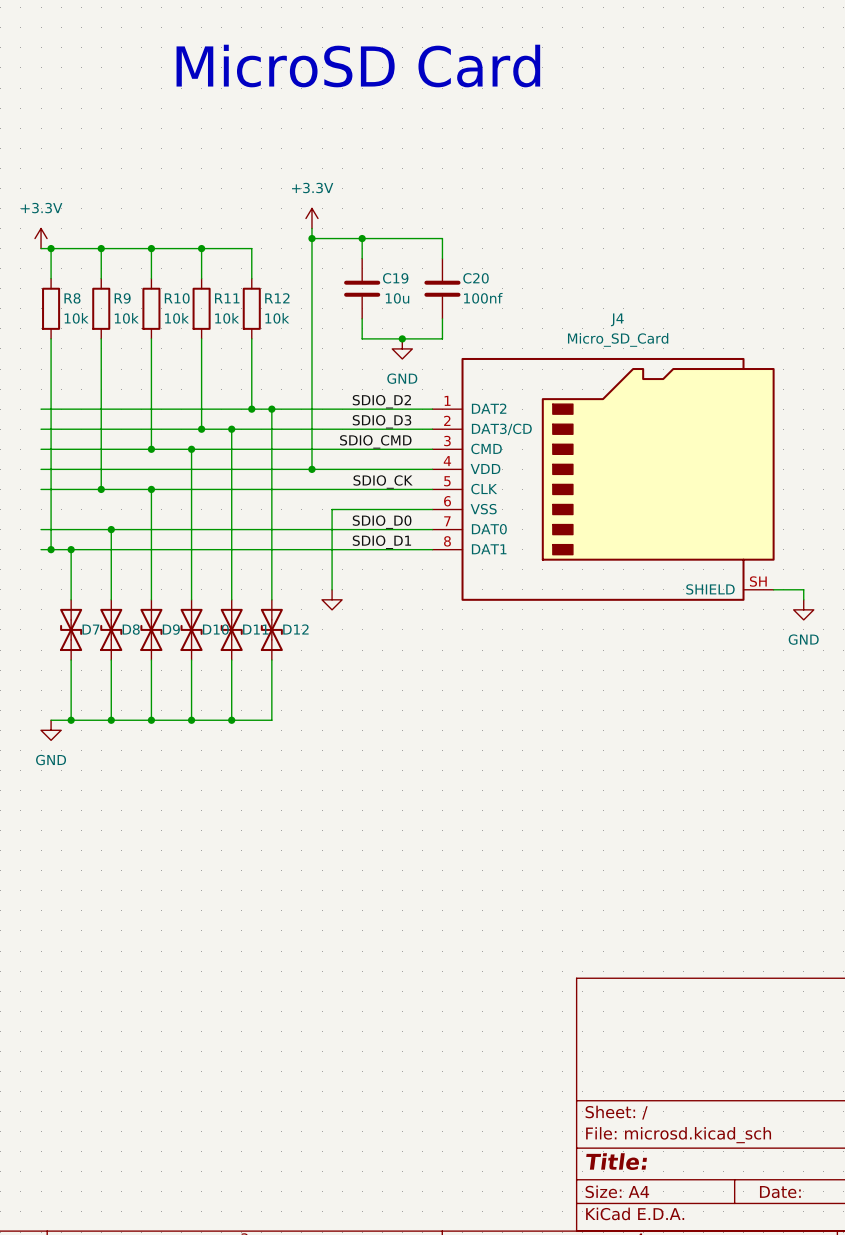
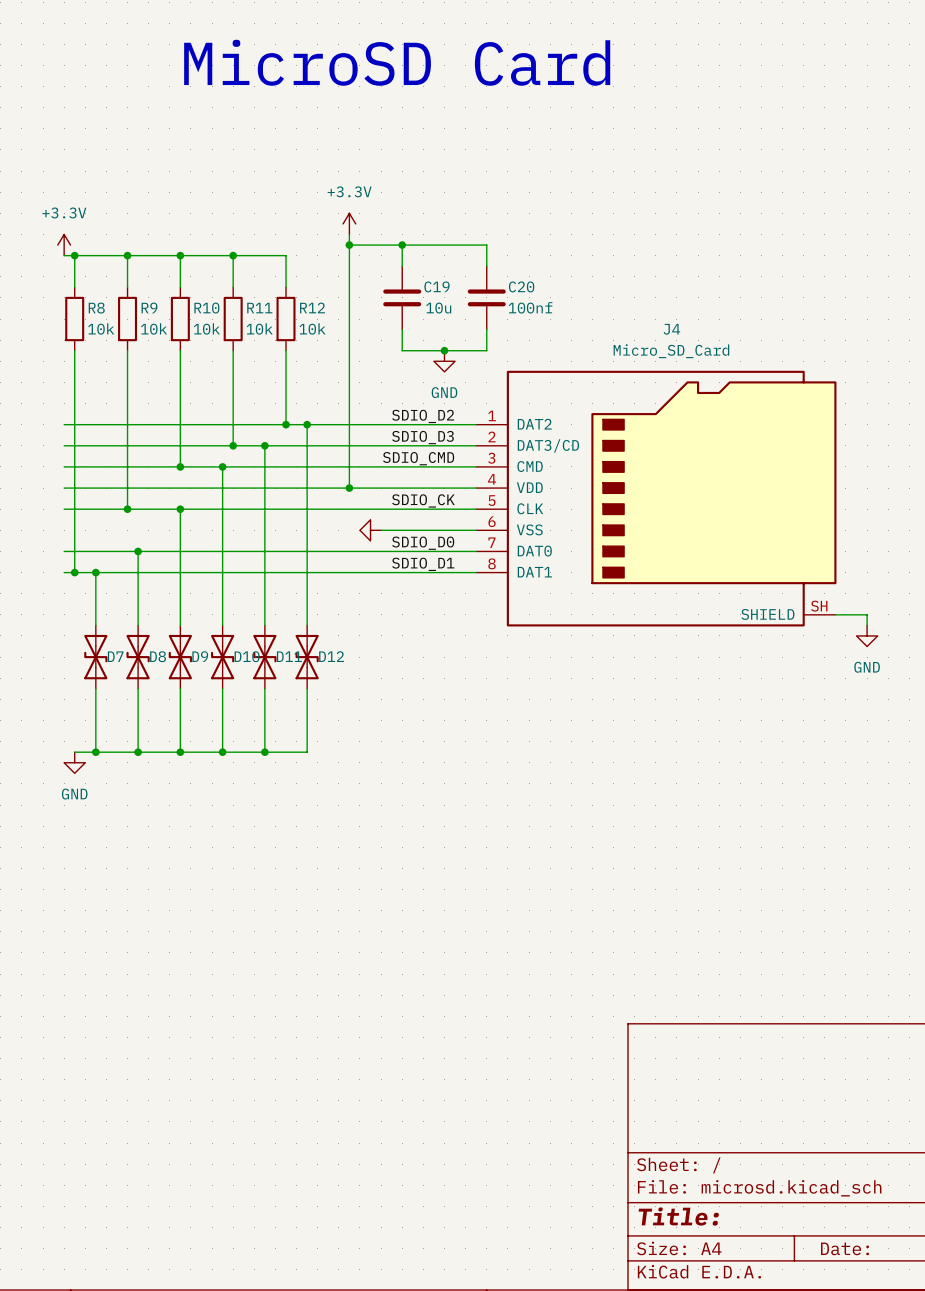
wire: (342, 509) (332, 509) (332, 589) -> none
power symbol rotation: 0° (332, 599) -> 90° clockwise (370, 530)
power symbol position: (332, 599) -> (370, 530)

